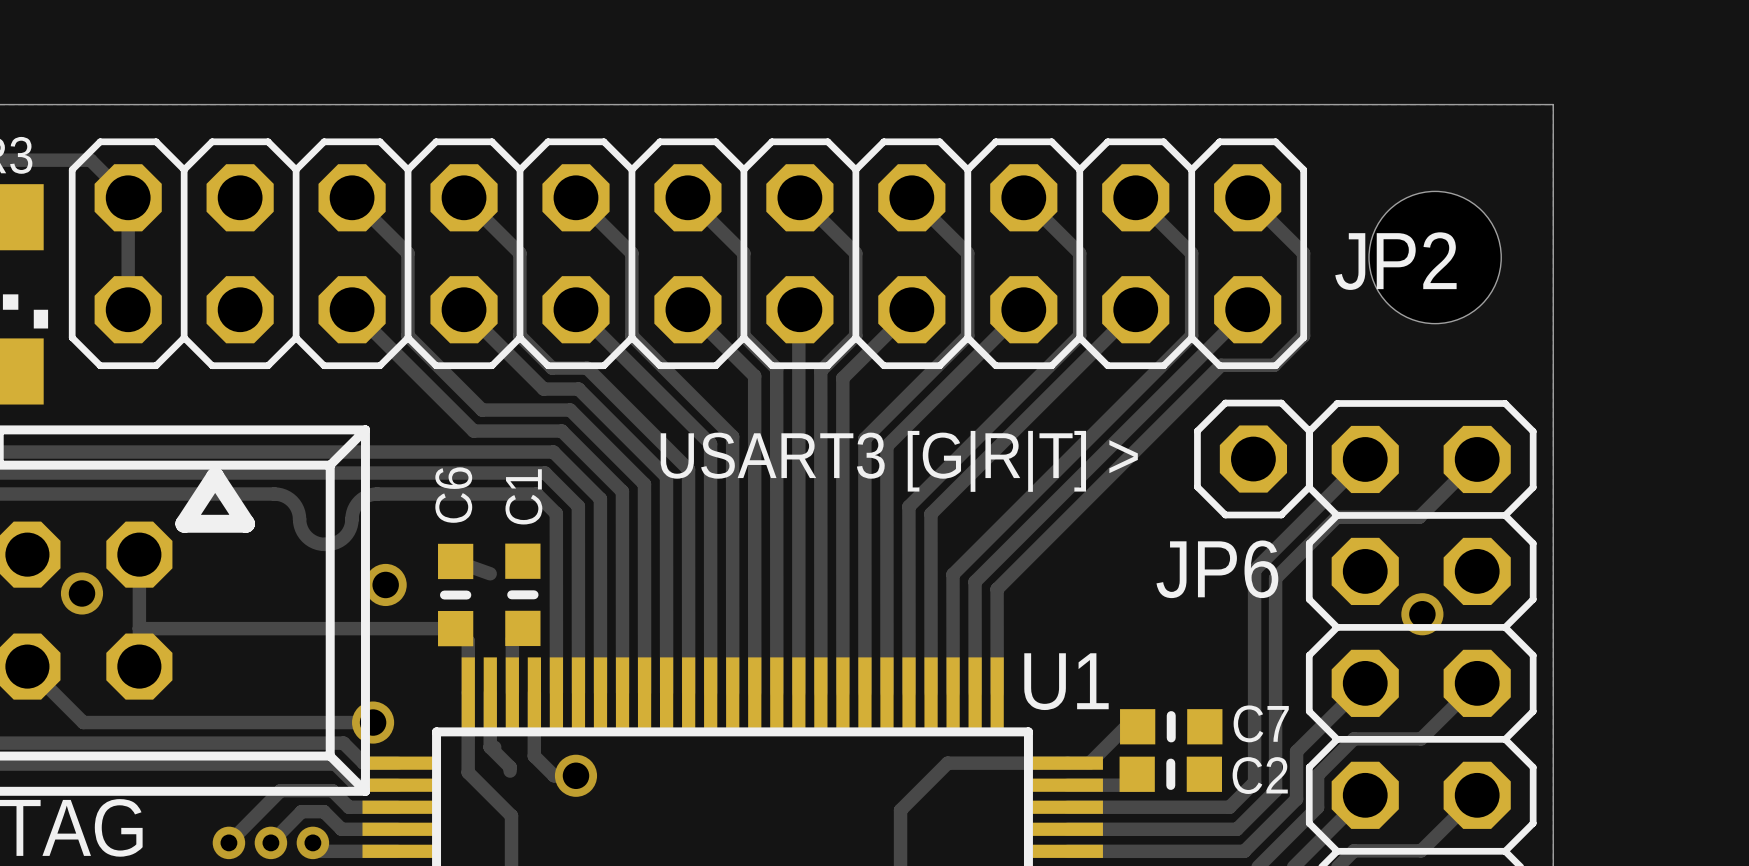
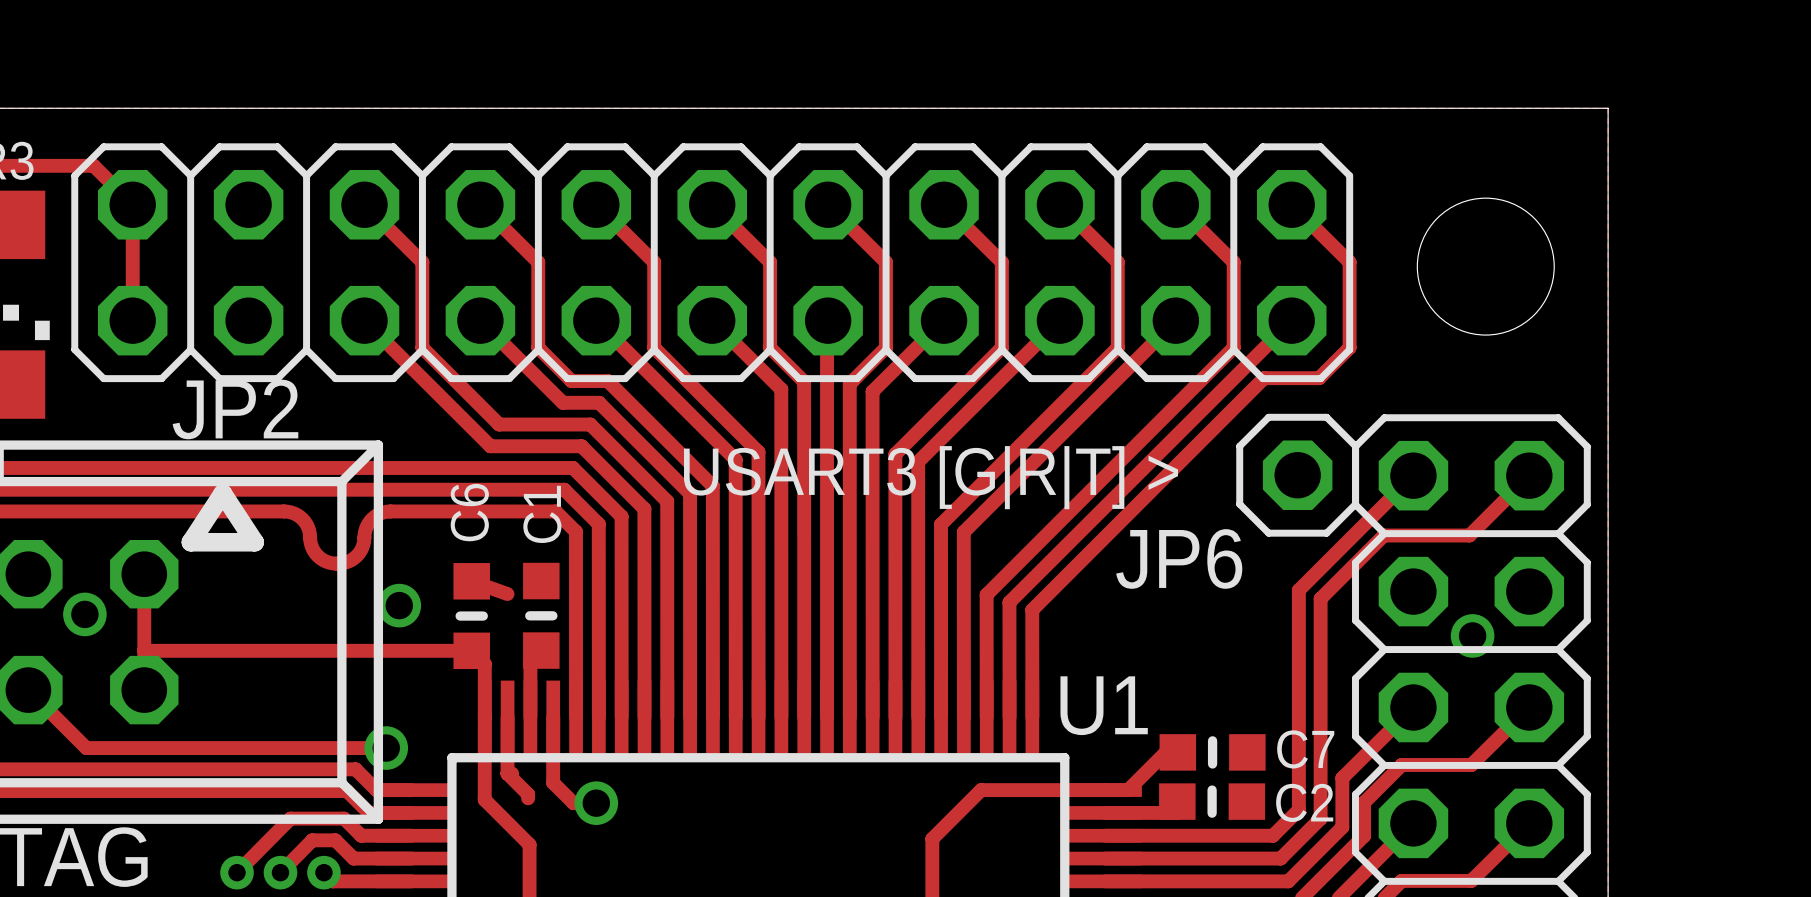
JP2 name position: JP2 (1395, 261) -> JP2 (235, 409)
JP6 name position: JP6 (1217, 569) -> JP6 (1179, 558)

